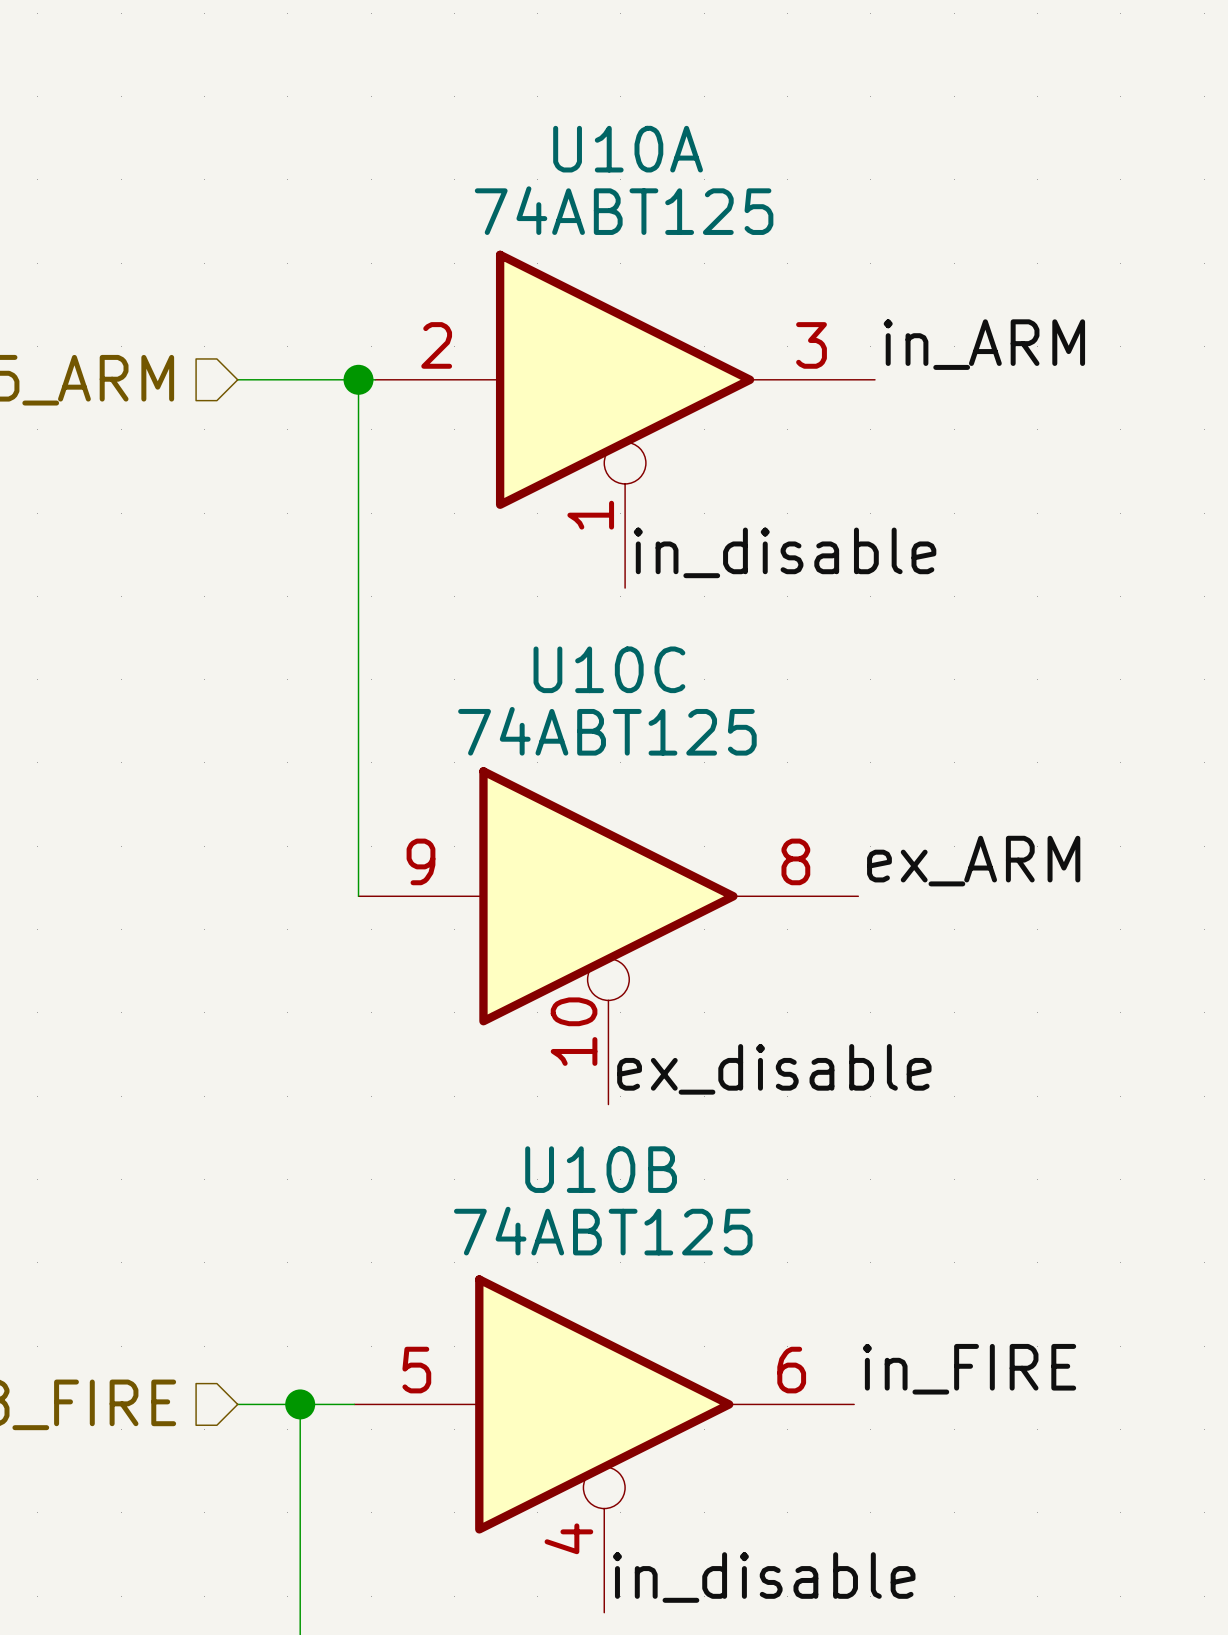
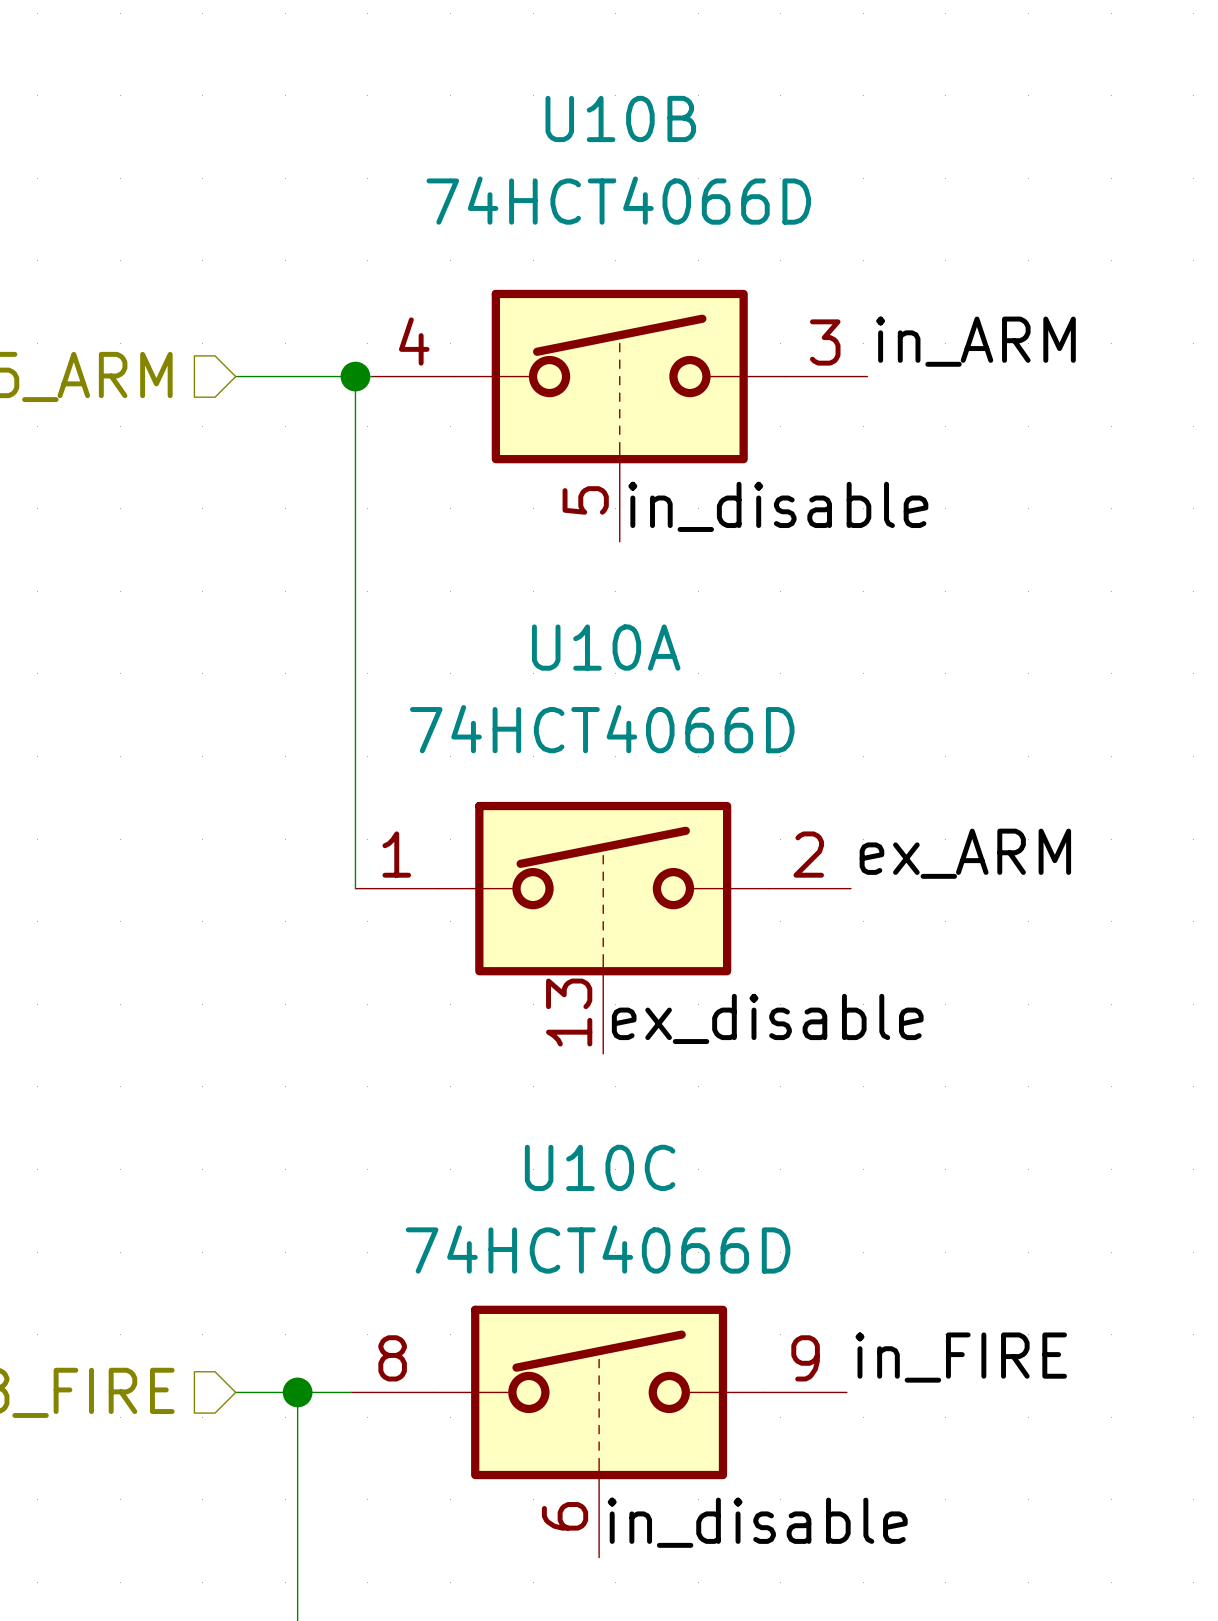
U10A value: 74ABT125 (624, 210) -> 74HCT4066D (602, 729)
U10A symbol: [375, 250, 875, 589] -> [355, 801, 852, 1054]
label position: in_disable (785, 552) -> in_disable (778, 506)
U10C value: 74ABT125 (607, 731) -> 74HCT4066D (598, 1249)
U10C symbol: [358, 767, 859, 1105] -> [351, 1305, 847, 1558]
label position: ex_disable (774, 1069) -> ex_disable (767, 1018)
U10B value: 74ABT125 (603, 1231) -> 74HCT4066D (618, 200)
U10B symbol: [354, 1275, 855, 1613] -> [371, 289, 868, 542]
label position: in_disable (764, 1577) -> in_disable (757, 1522)

